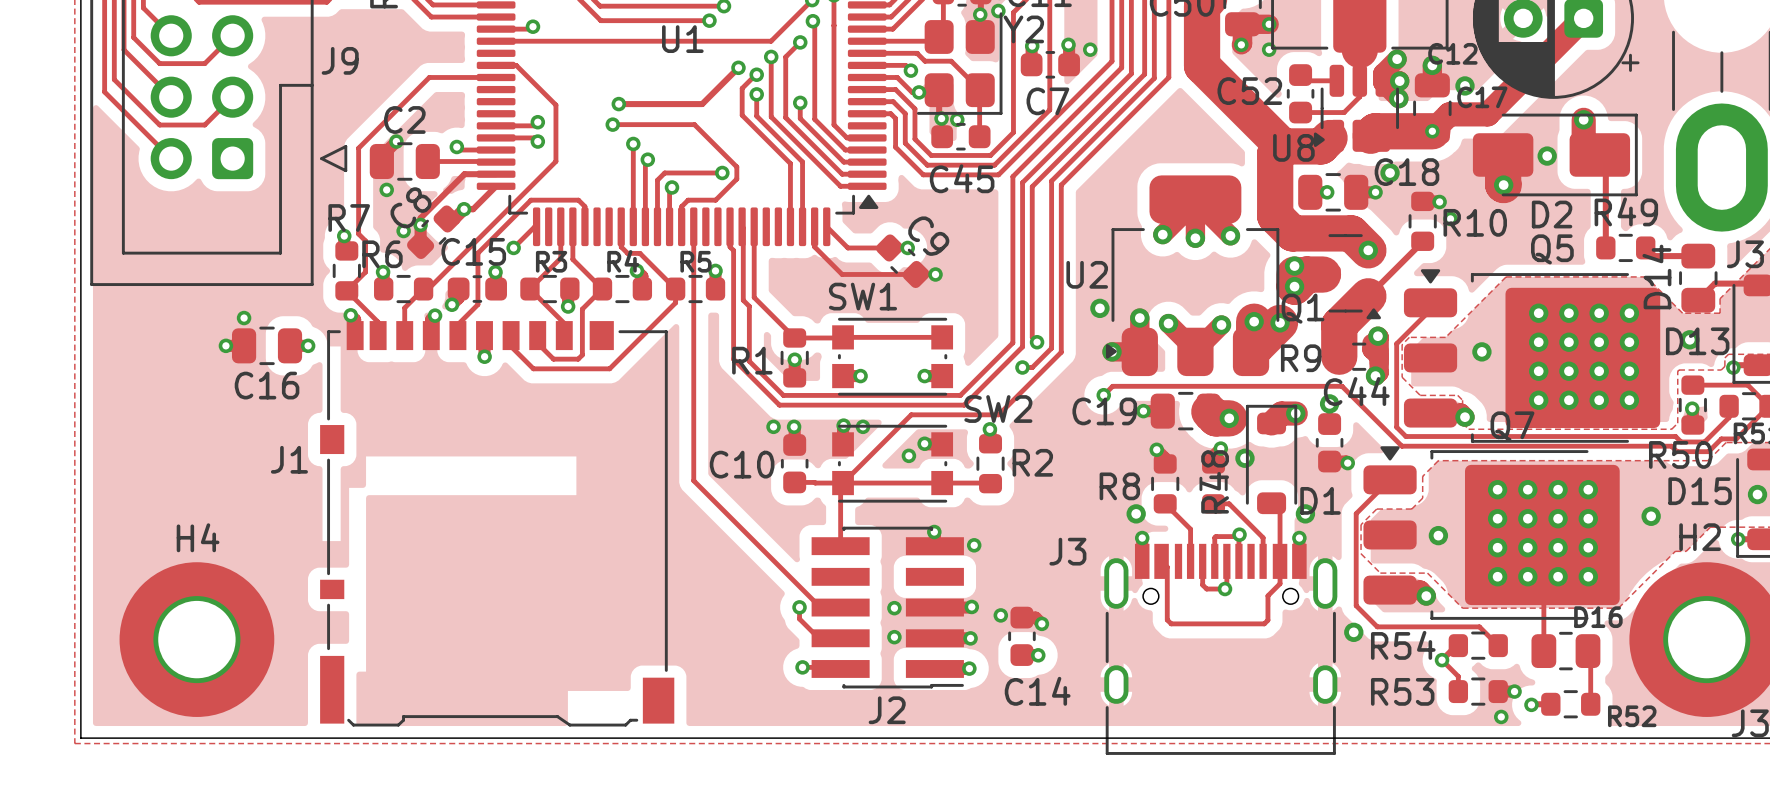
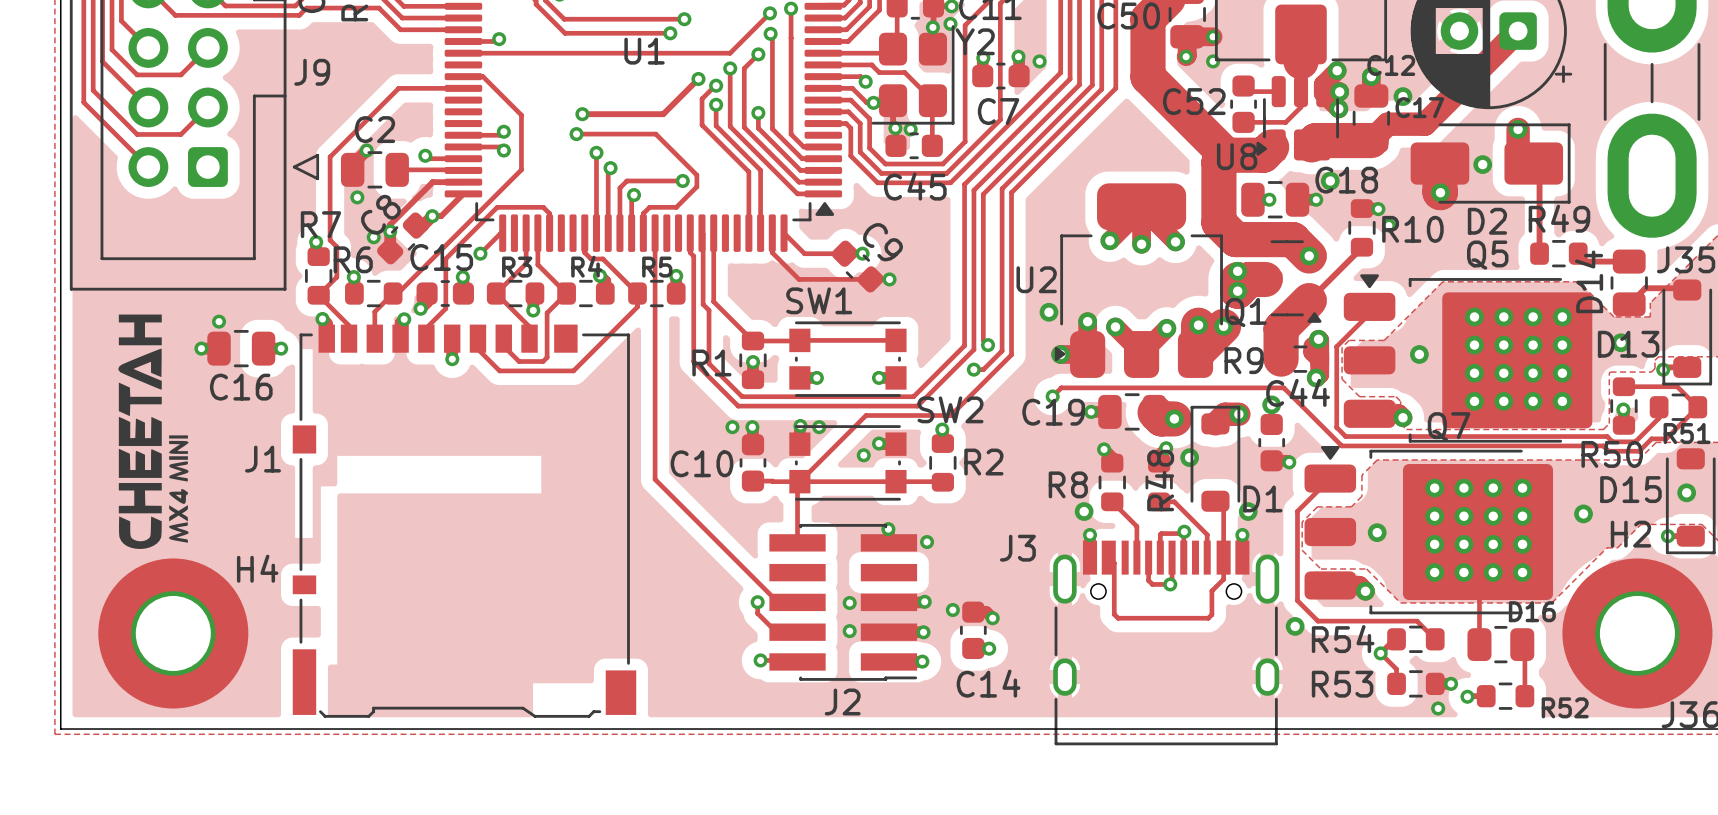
via: (1432, 131) -> none
drawing: none -> [118, 314, 189, 549]
H4 name position: H4 (198, 537) -> H4 (257, 568)

